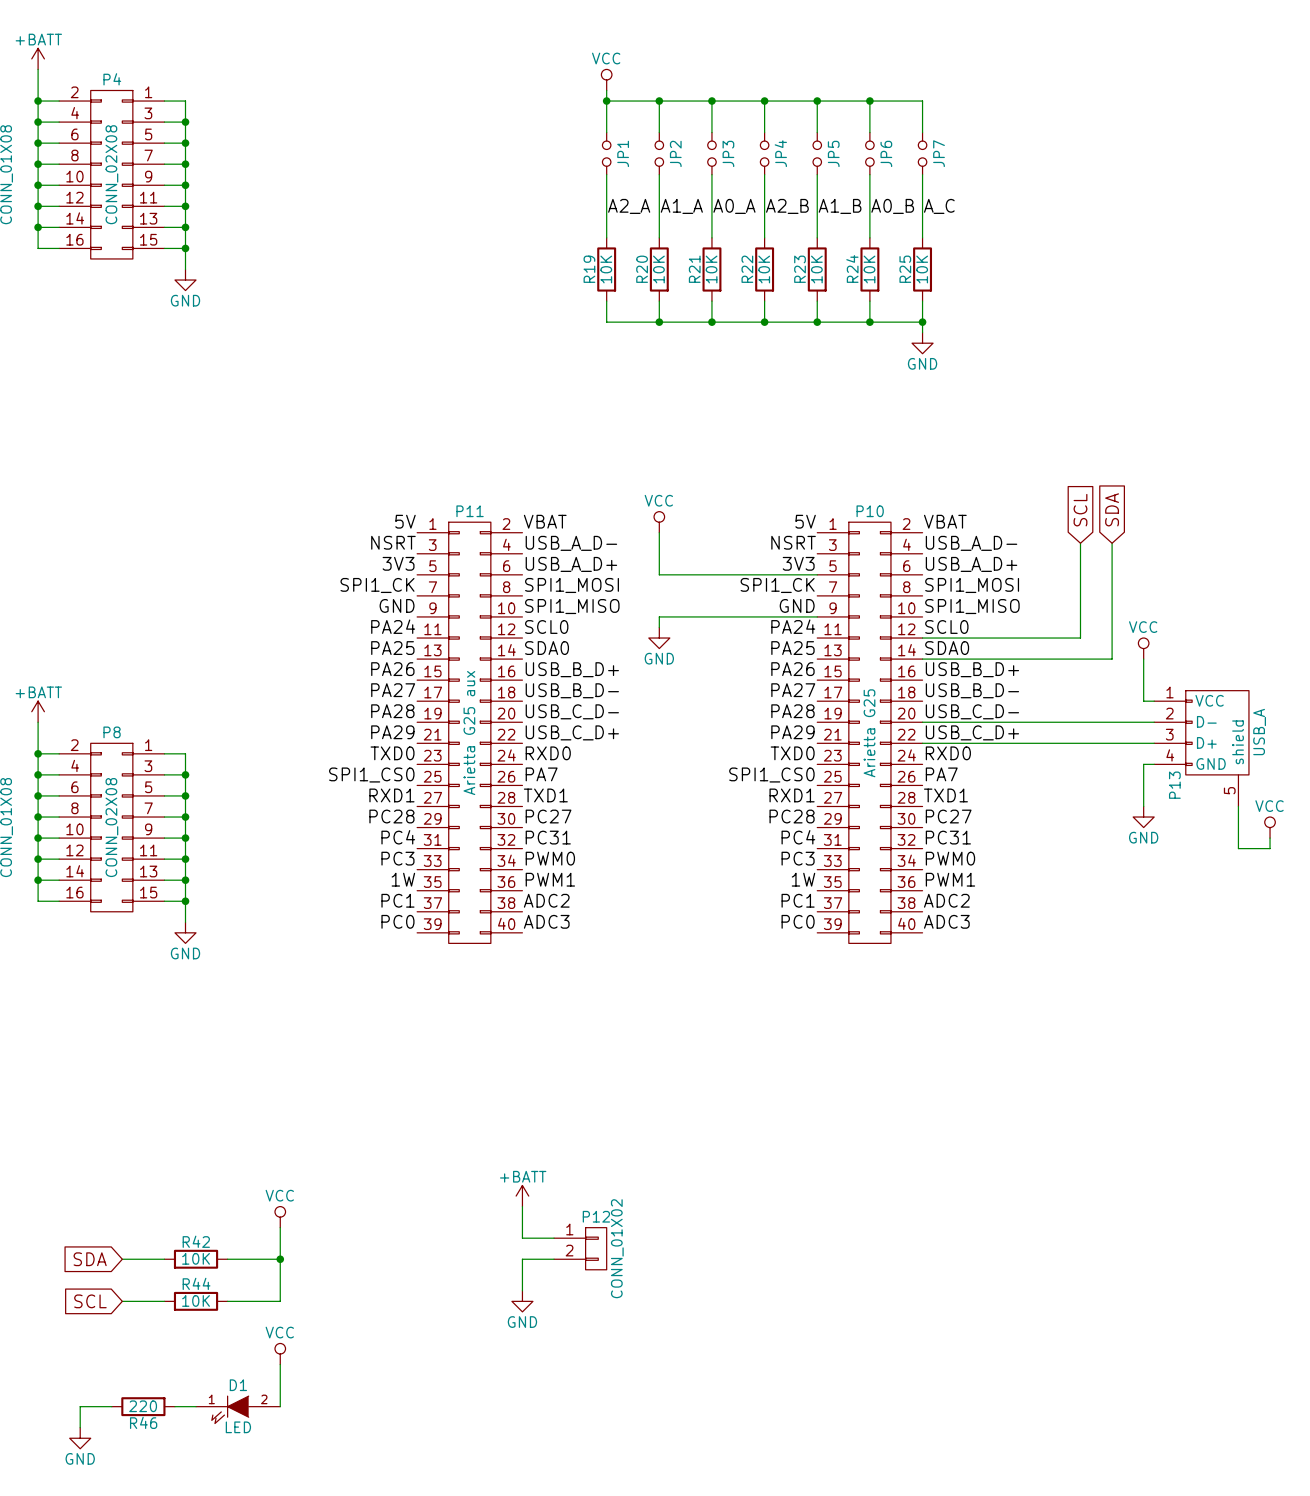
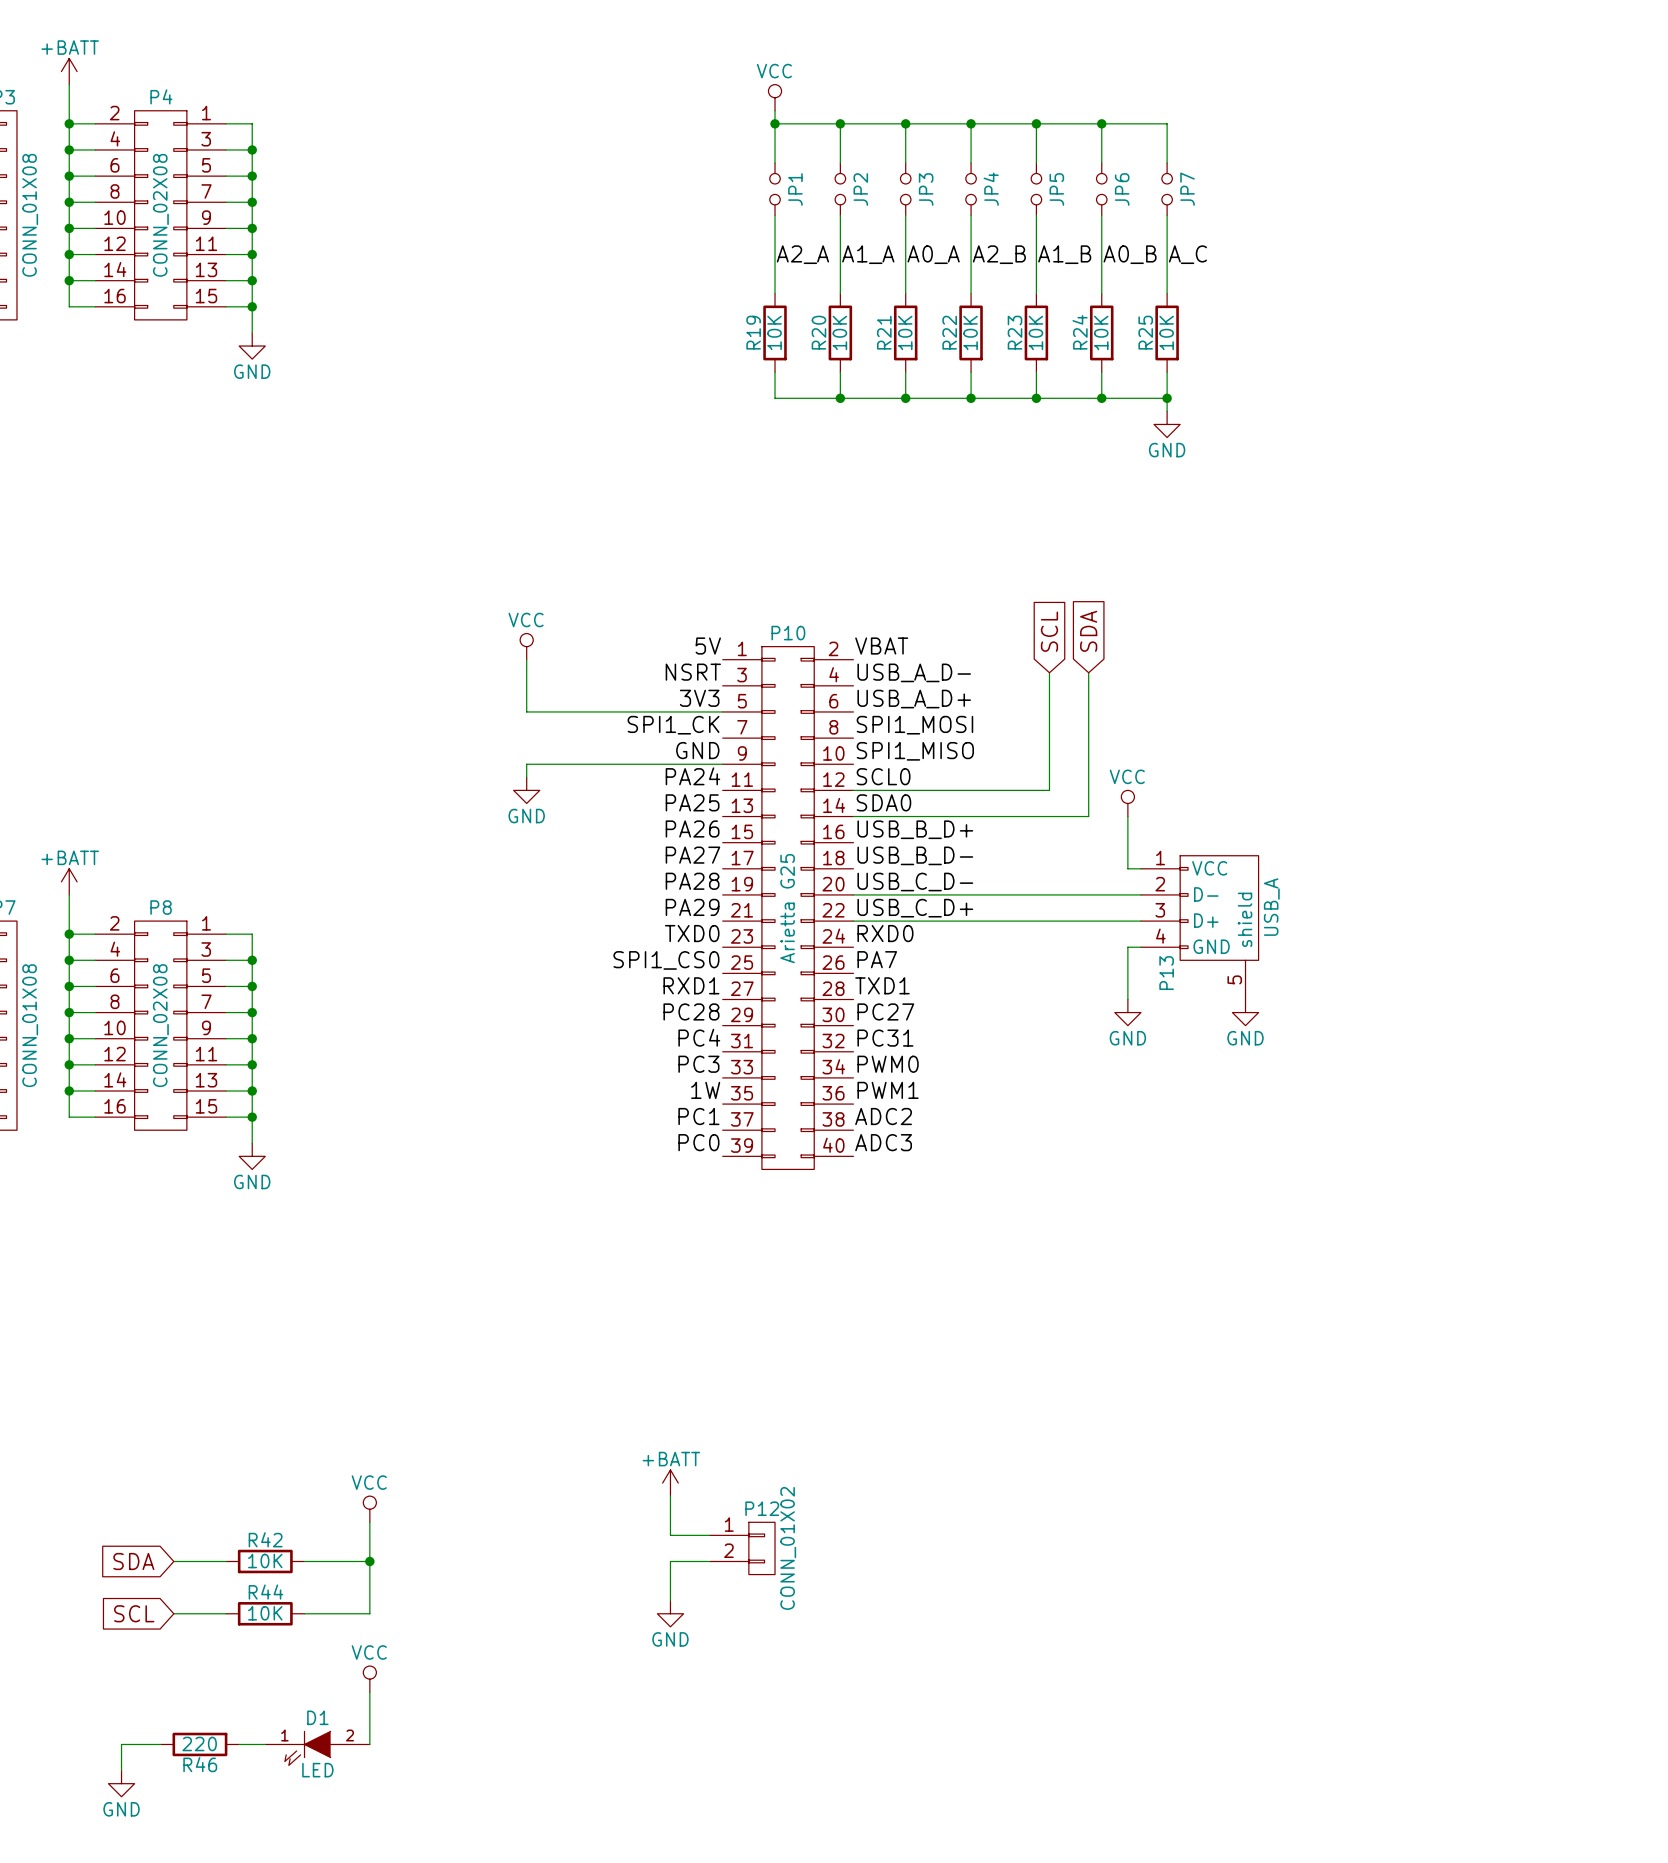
global label: none -> SDA (1088, 631)
global label: SDA (1112, 509) -> none
global label: none -> SCL (1049, 631)
global label: SCL (1080, 510) -> none
label: 5V (405, 521) -> none
label: VBAT (545, 521) -> none
label: none -> 5V (708, 646)
label: none -> VBAT (881, 646)
label: 5V (805, 521) -> none
label: VBAT (945, 521) -> none
power symbol: none -> VCC (526, 646)
power symbol: VCC (659, 522) -> none
wire: none -> (526, 659) (526, 711) (722, 711)
wire: (659, 532) (659, 574) (817, 574) -> none
label: NSRT (393, 542) -> none
label: none -> NSRT (693, 672)
label: NSRT (793, 542) -> none
label: USB_A_D- (571, 543) -> none
label: none -> USB_A_D- (914, 672)
wire: none -> (1049, 672) (1049, 790) (853, 790)
wire: none -> (1088, 672) (1088, 816) (853, 816)
label: USB_A_D- (971, 543) -> none
wire: (1080, 543) (1080, 638) (922, 638) -> none
wire: (1112, 543) (1112, 659) (922, 659) -> none
label: 3V3 (398, 563) -> none
label: none -> 3V3 (699, 698)
label: 3V3 (798, 563) -> none
label: USB_A_D+ (571, 564) -> none
label: none -> USB_A_D+ (914, 699)
label: USB_A_D+ (971, 564) -> none
label: SPI1_CK (377, 585) -> none
label: none -> SPI1_CK (673, 725)
label: SPI1_MOSI (572, 585) -> none
label: none -> SPI1_MOSI (914, 725)
label: SPI1_CK (777, 585) -> none
label: SPI1_MOSI (972, 585) -> none
label: GND (397, 605) -> none
label: none -> GND (697, 750)
label: GND (797, 605) -> none
label: SPI1_MISO (572, 606) -> none
label: none -> SPI1_MISO (915, 751)
label: SPI1_MISO (972, 606) -> none
wire: none -> (722, 764) (526, 764) (526, 777)
wire: (817, 616) (659, 616) (659, 627) -> none
label: PA24 (393, 626) -> none
label: none -> PA24 (692, 776)
label: SCL0 (546, 626) -> none
label: none -> SCL0 (883, 776)
label: PA24 (793, 626) -> none
label: SCL0 (946, 626) -> none
power symbol: none -> GND (526, 790)
power symbol: GND (659, 638) -> none
label: PA25 (392, 648) -> none
label: none -> PA25 (692, 802)
label: SDA0 (547, 648) -> none
label: none -> SDA0 (883, 802)
label: PA25 (792, 648) -> none
power symbol: none -> VCC (1127, 803)
label: SDA0 (947, 648) -> none
power symbol: VCC (1143, 648) -> none
wire: (1143, 659) (1143, 701) (1154, 701) -> none
label: PA26 (392, 669) -> none
label: none -> PA26 (692, 828)
label: USB_B_D+ (572, 669) -> none
label: none -> USB_B_D+ (915, 829)
label: PA26 (792, 669) -> none
label: USB_B_D+ (972, 669) -> none
label: PA27 (393, 690) -> none
label: none -> PA27 (692, 855)
label: USB_B_D- (572, 690) -> none
label: none -> USB_B_D- (915, 855)
label: PA27 (793, 690) -> none
label: USB_B_D- (972, 690) -> none
label: PA28 (392, 711) -> none
label: none -> PA28 (692, 881)
label: USB_C_D- (572, 711) -> none
label: none -> USB_C_D- (915, 882)
label: PA28 (792, 711) -> none
label: USB_C_D- (972, 711) -> none
wire: none -> (853, 894) (1140, 894)
wire: (922, 722) (1154, 722) -> none
label: PA29 (392, 732) -> none
P11: Arietta G25 aux (469, 732) -> none
label: none -> PA29 (692, 907)
label: USB_C_D+ (572, 732) -> none
label: none -> USB_C_D+ (915, 908)
label: PA29 (792, 732) -> none
P10 position: (869, 732) -> (788, 908)
label: USB_C_D+ (972, 732) -> none
wire: none -> (853, 921) (1140, 921)
wire: (922, 743) (1154, 743) -> none
P13 position: (1201, 748) -> (1199, 927)
label: TXD0 (392, 753) -> none
label: RXD0 (548, 753) -> TXD0 (692, 933)
label: none -> RXD0 (885, 933)
label: TXD0 (792, 753) -> none
label: RXD0 (948, 753) -> none
wire: (1154, 764) (1143, 764) (1143, 806) -> none
label: PA7 (541, 774) -> none
label: none -> PA7 (877, 959)
label: PA7 (941, 774) -> none
label: SPI1_CS0 (371, 775) -> none
label: none -> SPI1_CS0 (666, 960)
label: SPI1_CS0 (771, 775) -> none
label: RXD1 (391, 795) -> none
label: TXD1 (545, 795) -> RXD1 (691, 985)
label: none -> TXD1 (882, 985)
label: RXD1 (792, 795) -> none
label: TXD1 (945, 795) -> none
wire: (1238, 806) (1238, 848) (1270, 848) (1270, 838) -> none
label: PC28 (391, 816) -> none
label: PC27 (548, 816) -> PC28 (691, 1011)
label: none -> PC27 (885, 1011)
label: PC28 (792, 816) -> none
label: PC27 (948, 816) -> none
power symbol: none -> GND (1127, 1012)
power symbol: none -> GND (1245, 1012)
power symbol: GND (1143, 817) -> none
power symbol: VCC (1270, 827) -> none
label: PC4 (398, 837) -> none
label: none -> PC4 (699, 1037)
label: PC31 (548, 837) -> PC3 (698, 1064)
label: none -> PC31 (885, 1038)
label: PC4 (798, 837) -> none
label: PC31 (948, 837) -> none
label: PC3 (397, 858) -> none
label: PWM0 (550, 858) -> none
label: none -> PWM0 (888, 1064)
label: PC3 (798, 858) -> none
label: PWM0 (950, 858) -> none
label: 1W (403, 879) -> none
label: PWM1 (550, 879) -> none
label: none -> 1W (705, 1090)
label: none -> PWM1 (888, 1090)
label: 1W (803, 879) -> none
label: PWM1 (950, 879) -> none
label: PC1 (397, 900) -> none
label: none -> PC1 (698, 1116)
label: ADC2 (546, 900) -> none
label: none -> ADC2 (883, 1116)
label: PC1 (798, 900) -> none
label: ADC2 (946, 900) -> none
label: PC0 (397, 921) -> none
label: none -> PC0 (698, 1142)
label: ADC3 (546, 921) -> none
label: none -> ADC3 (883, 1142)
label: PC0 (798, 921) -> none
label: ADC3 (946, 921) -> none

